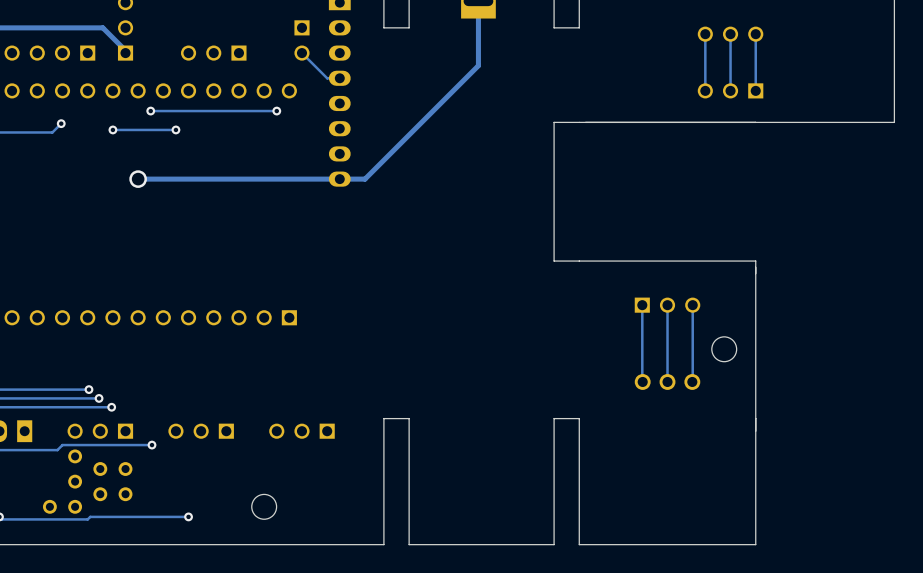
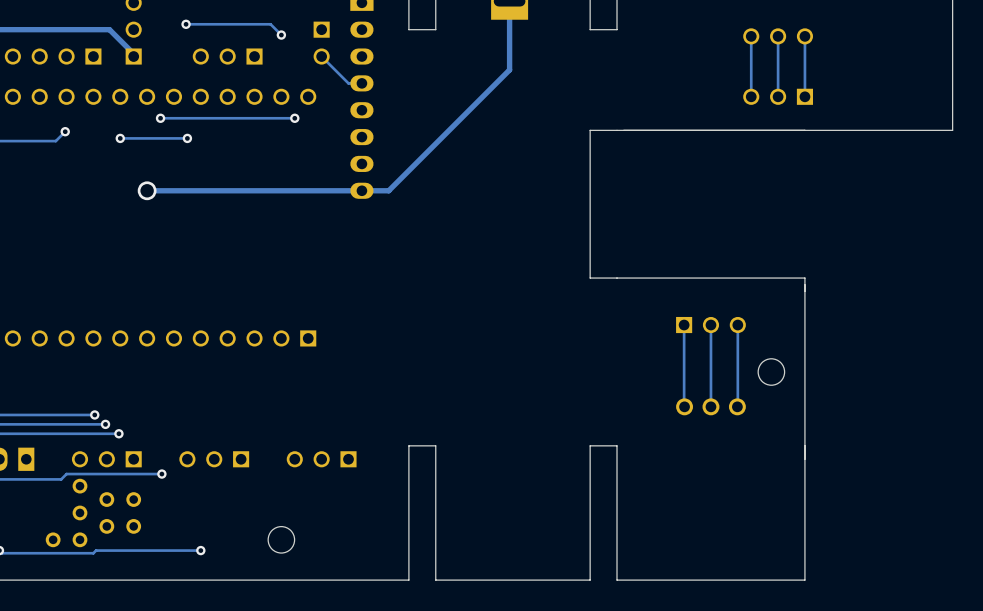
track: none -> (186, 24) (270, 24) (281, 35)
via: none -> (186, 24)
via: none -> (281, 35)

